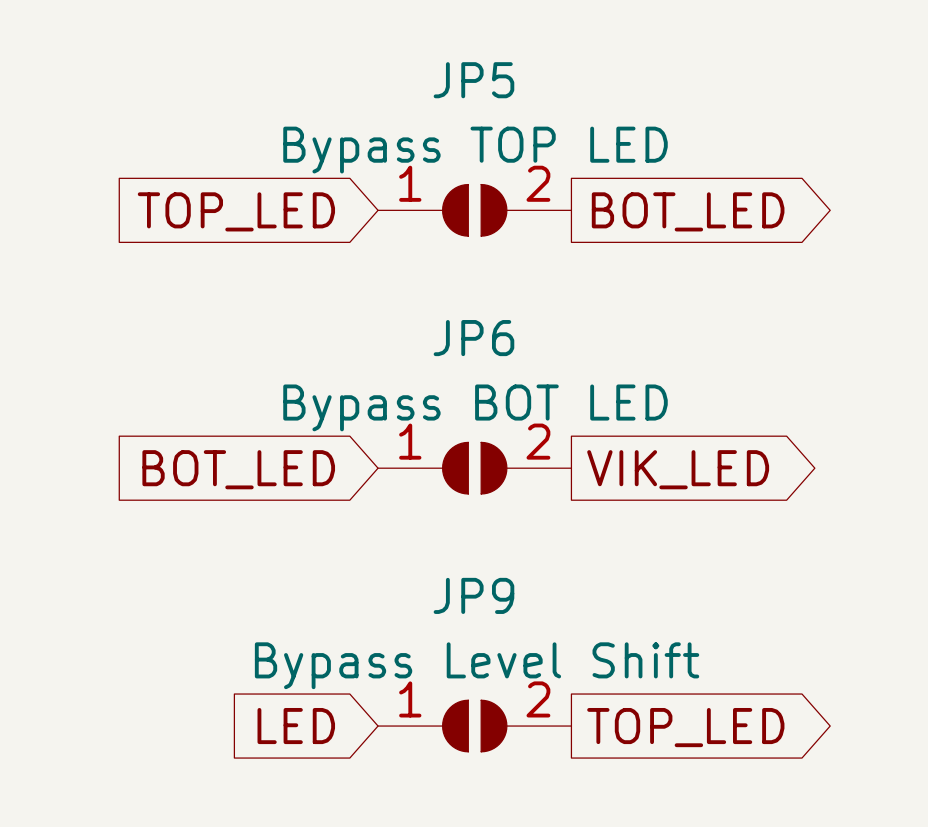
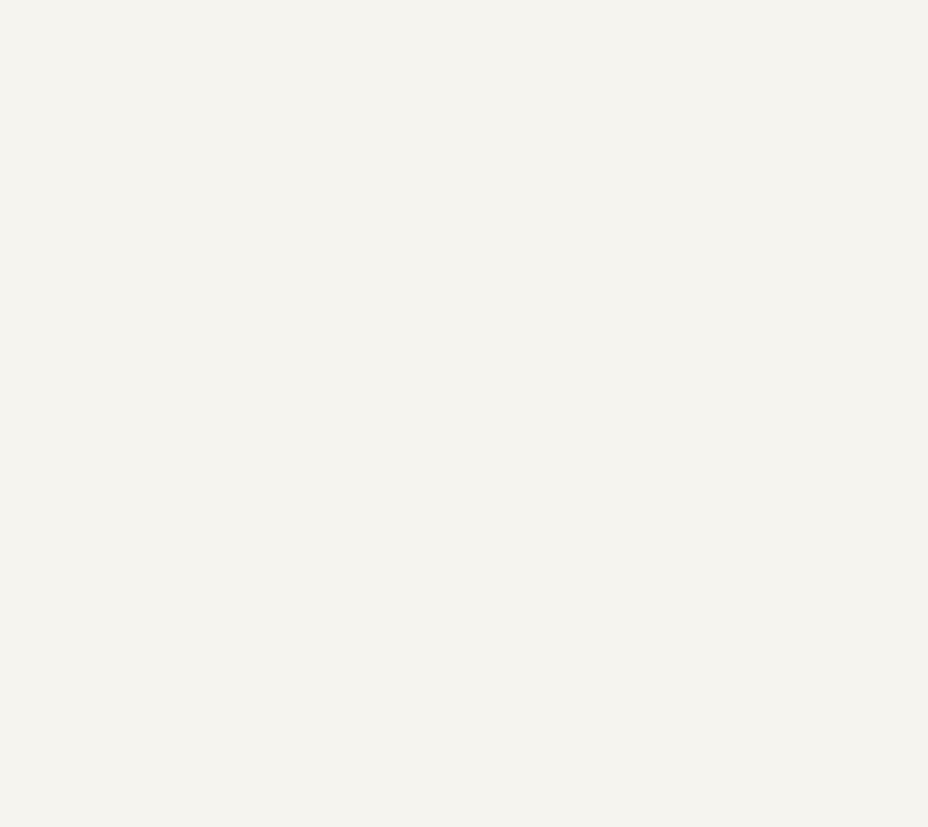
JP5: Bypass TOP LED (474, 210) -> none
global label: TOP_LED (236, 211) -> none
global label: BOT_LED (688, 211) -> none
JP6: Bypass BOT LED (474, 468) -> none
global label: BOT_LED (238, 469) -> none
global label: VIK_LED (678, 469) -> none
global label: LED (296, 726) -> none
JP9: Bypass Level Shift (474, 726) -> none
global label: TOP_LED (685, 727) -> none

